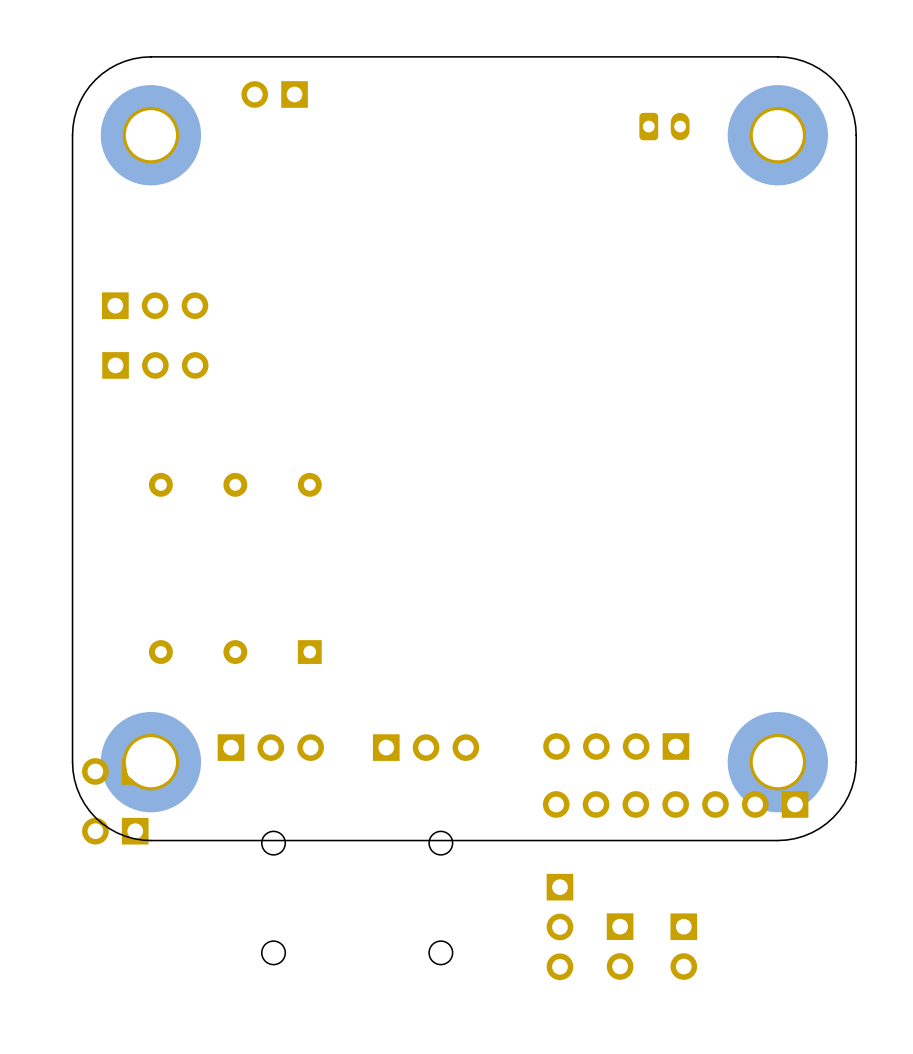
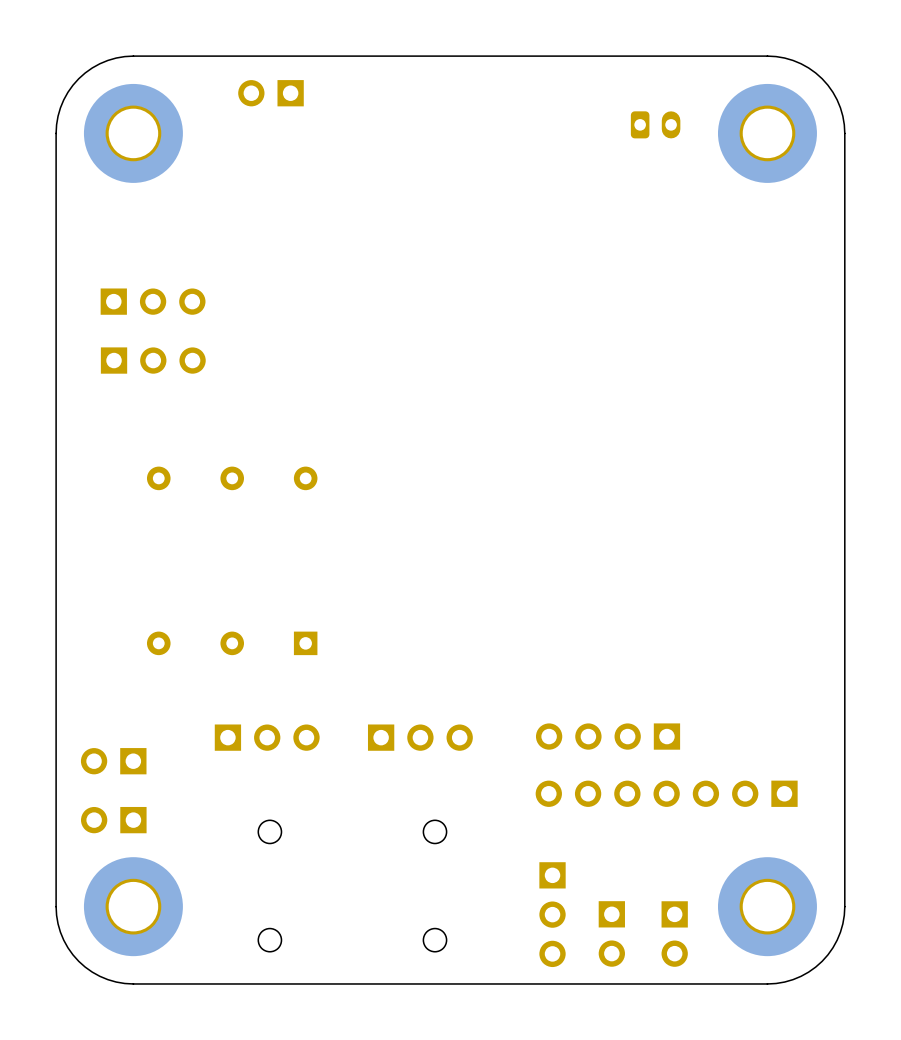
board edge: (150, 56) (133, 58) (116, 64) (95, 79) (80, 101) (73, 126) (72, 762) (74, 779) (80, 796) (95, 817) (116, 832) (133, 838) (150, 840) (786, 840) (811, 832) (833, 817) (848, 796) (854, 779) (856, 762) -> (148, 56) (116, 58) (99, 63) (85, 72) (72, 85) (63, 99) (56, 124) (56, 906) (58, 923) (63, 940) (78, 961) (92, 972) (107, 979) (133, 983) (767, 983) (784, 982) (801, 976) (822, 961) (832, 947) (842, 923) (844, 906) (844, 752)
part position: (150, 135) -> (133, 133)
part position: (150, 762) -> (133, 906)
part position: (777, 762) -> (767, 906)

